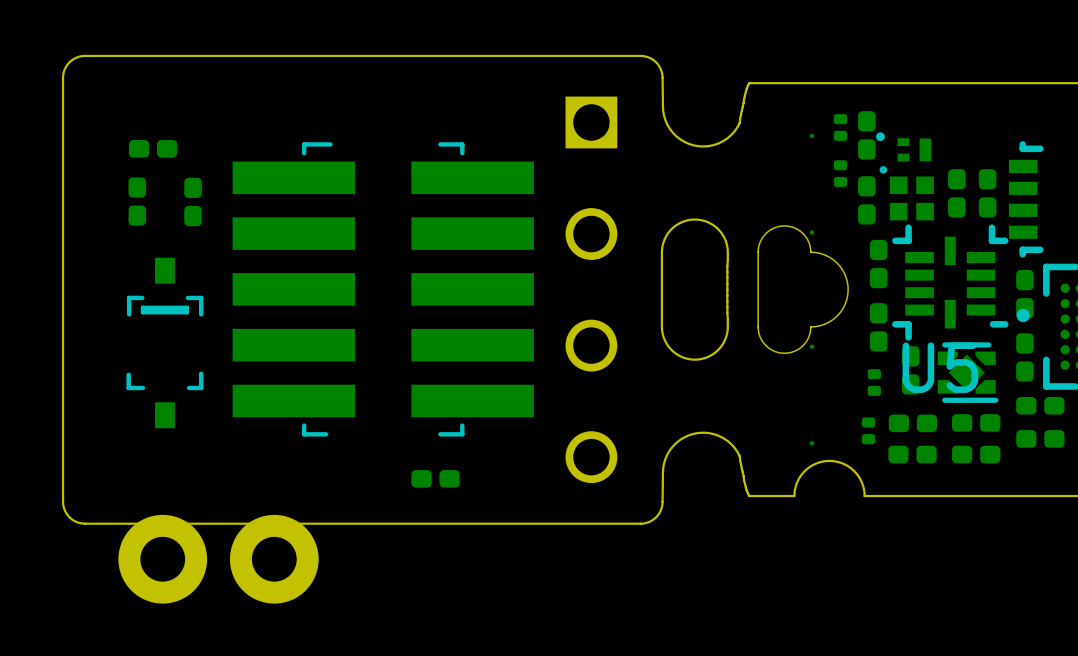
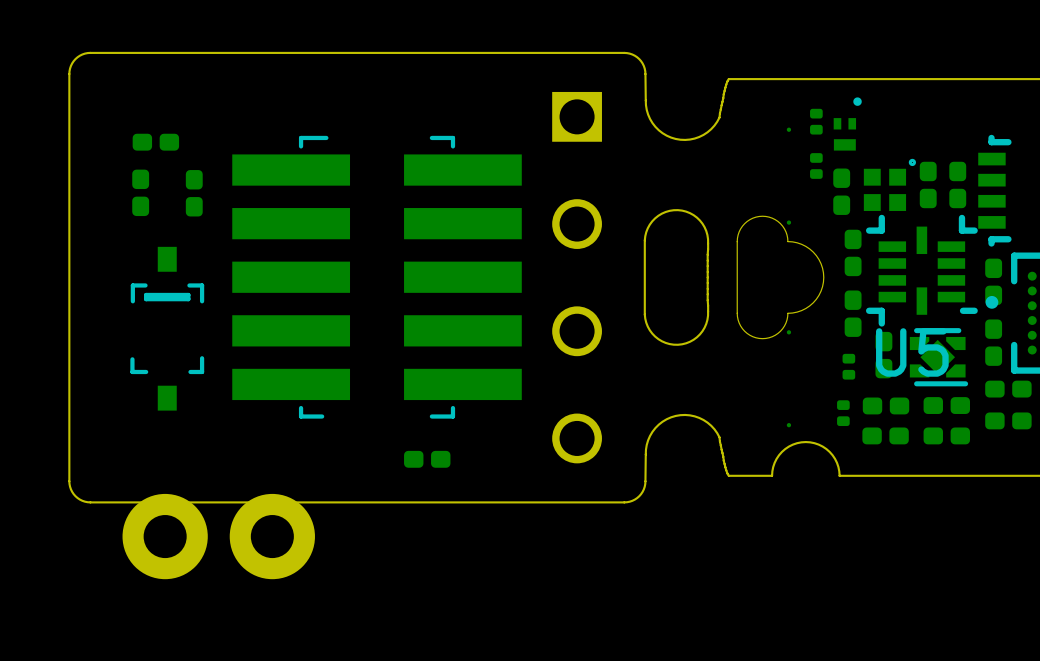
part footprint: [858, 111, 876, 160] -> [833, 97, 862, 151]
part: (903, 146) -> none
part rotation: 0° (906, 193) -> 90° clockwise (889, 184)

